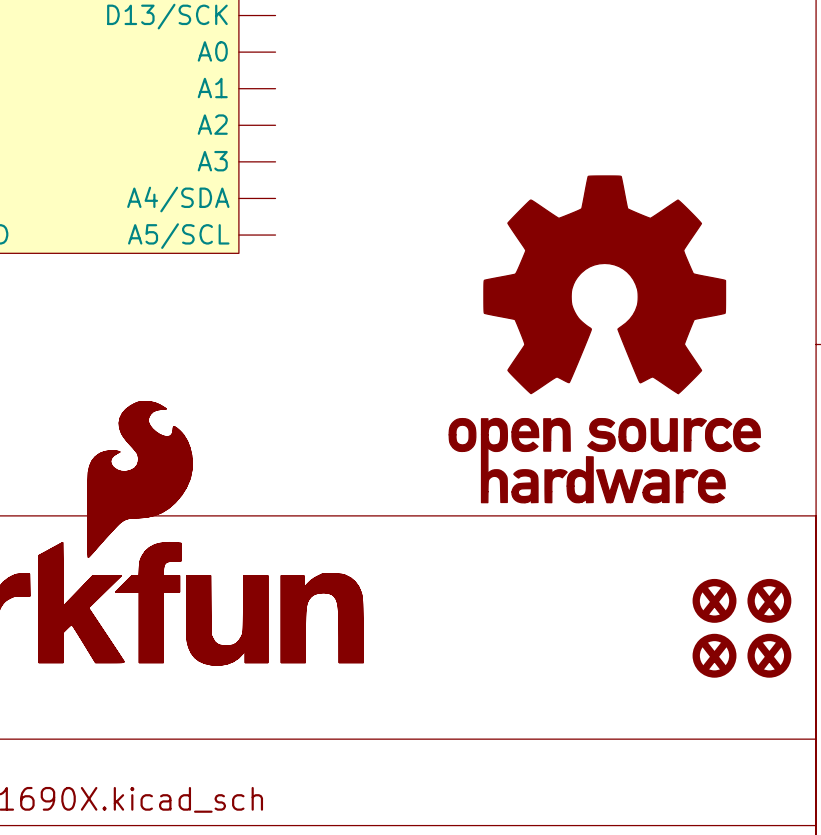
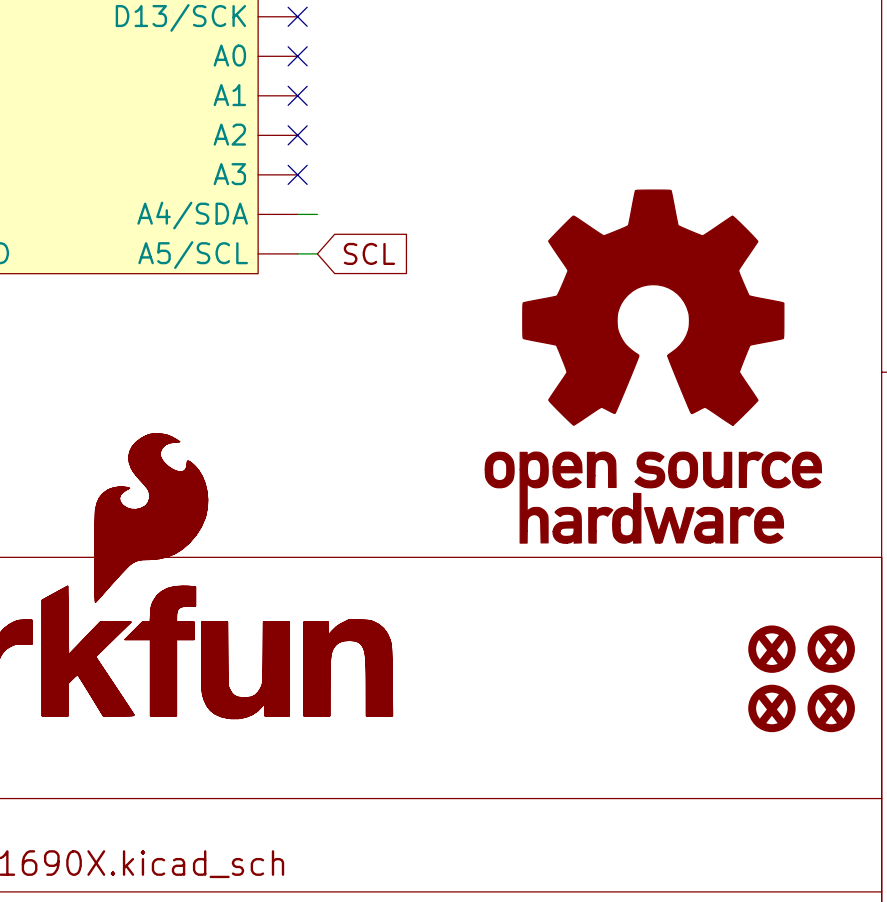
no-connect mark: none -> (297, 16)
no-connect mark: none -> (297, 56)
no-connect mark: none -> (297, 95)
no-connect mark: none -> (297, 135)
no-connect mark: none -> (297, 174)
wire: none -> (297, 214) (317, 214)
wire: none -> (297, 253) (317, 253)
global label: none -> SCL (369, 253)

